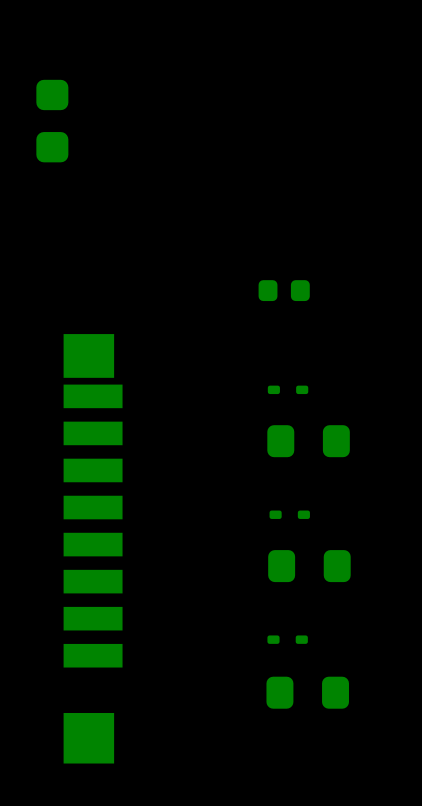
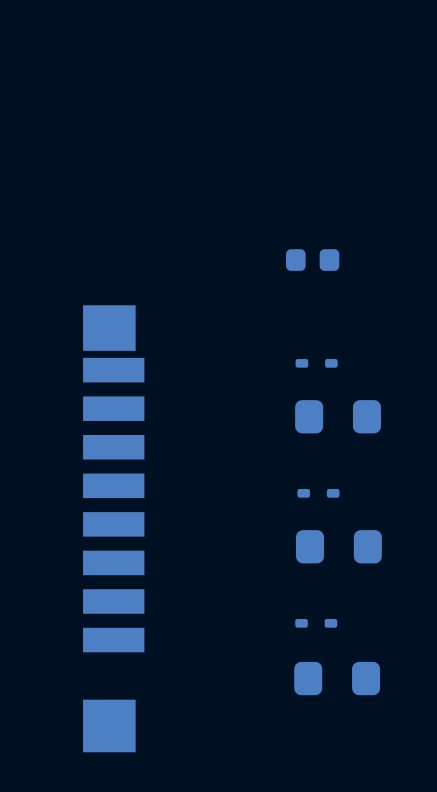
part: (52, 121) -> none

